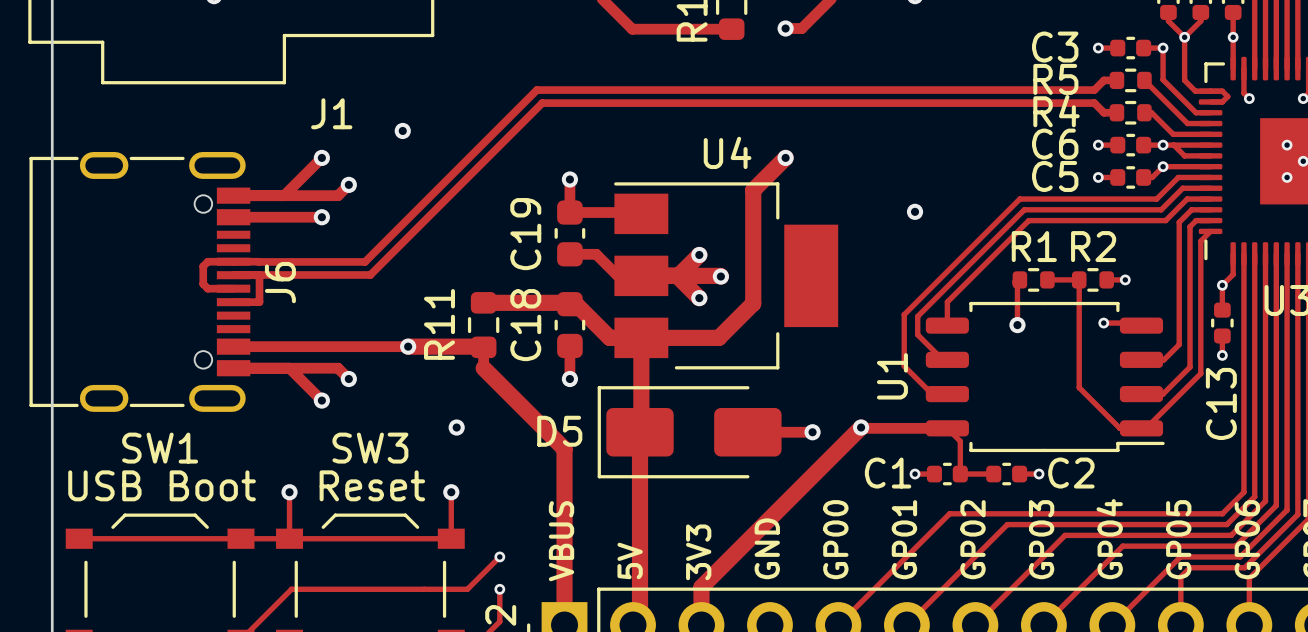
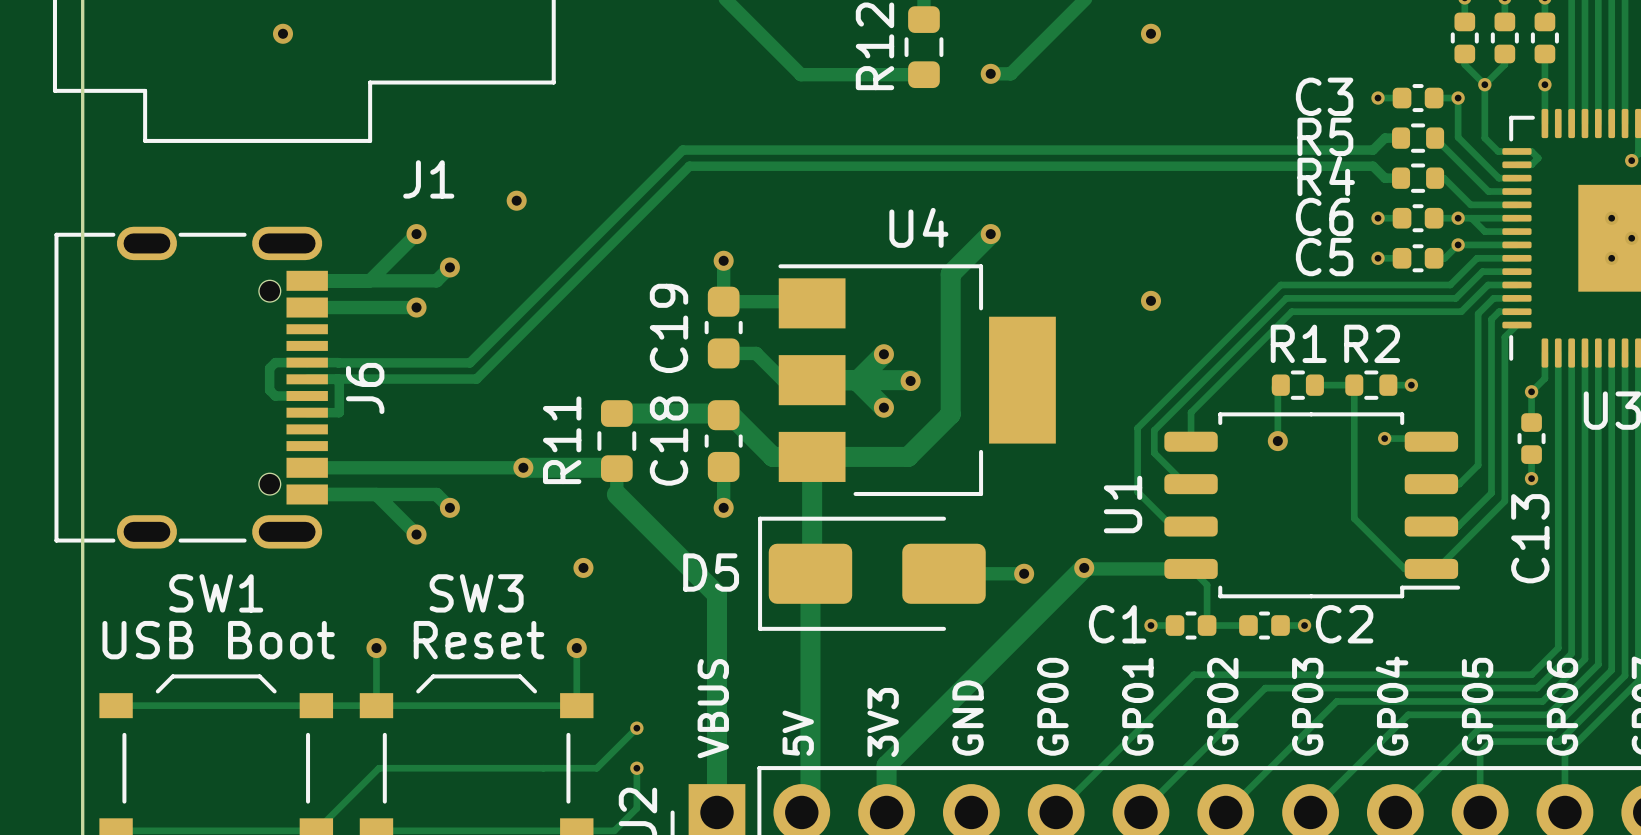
track: (1243, 68) (1243, 93) (1249, 98) -> none
via: (1249, 98) -> none

